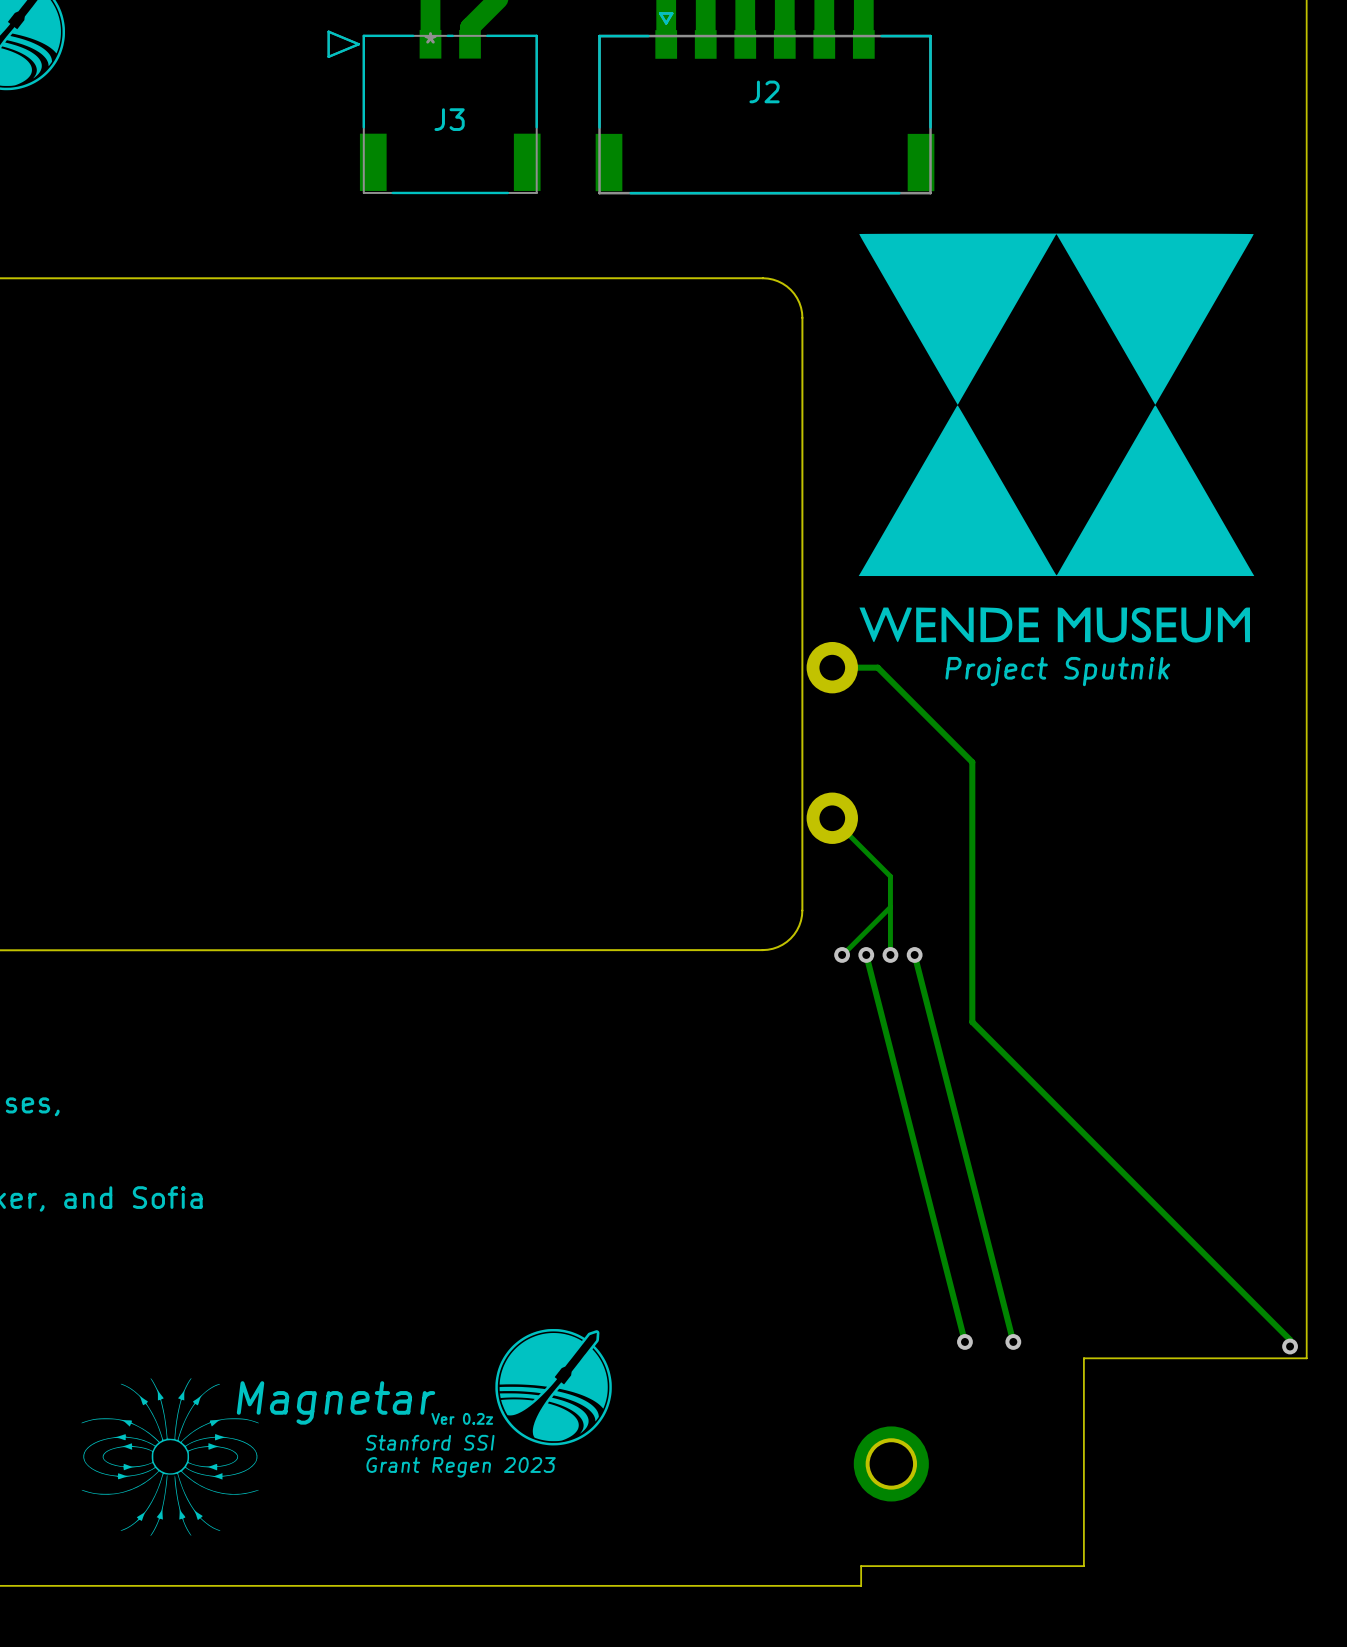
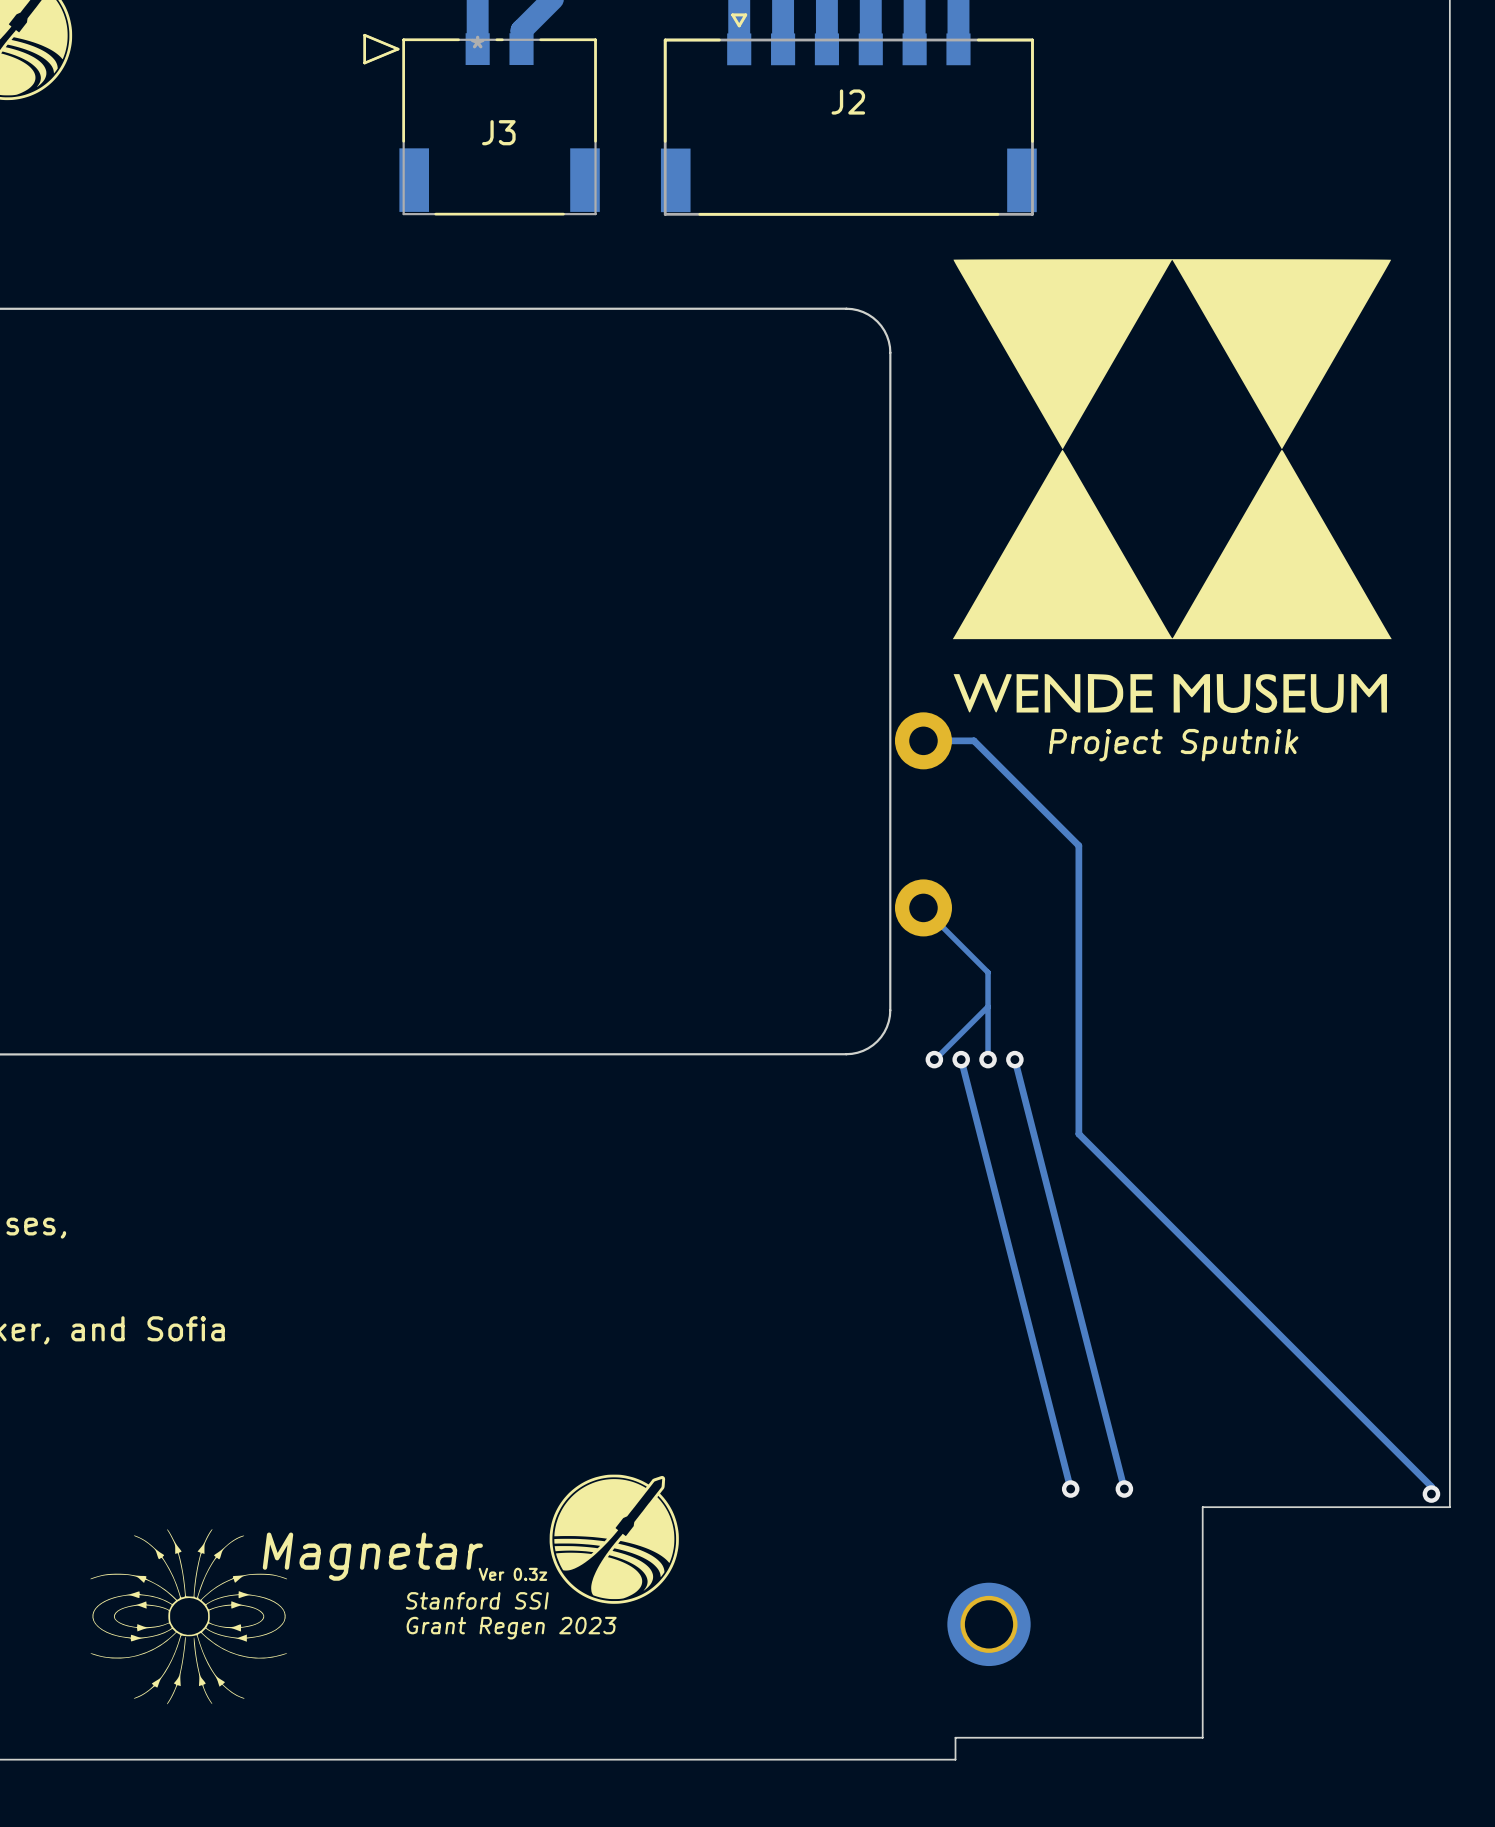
text: Ver 0.2z (462, 1418) -> Ver 0.3z (512, 1574)

